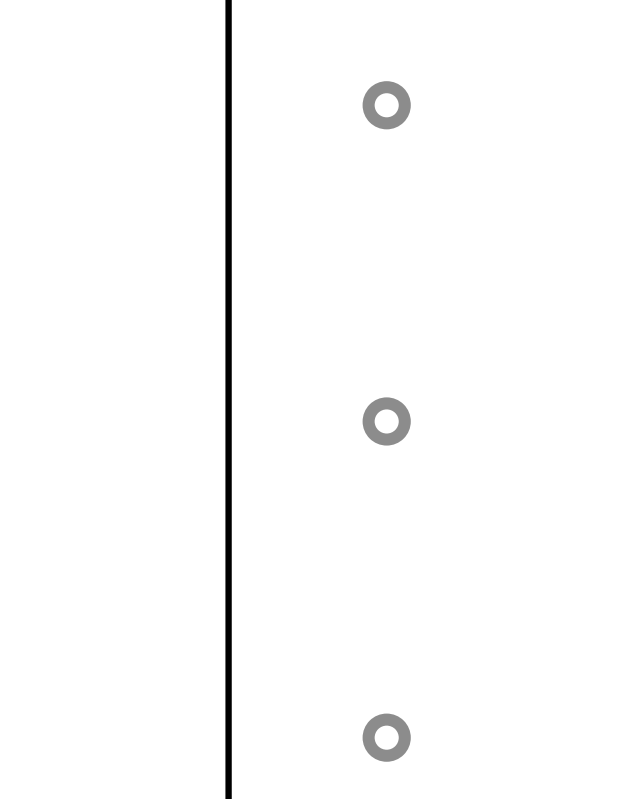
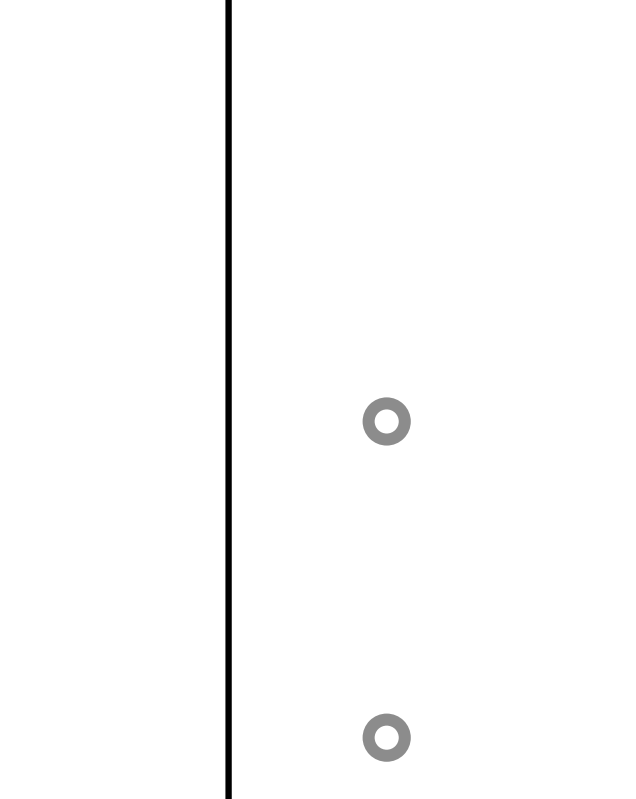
via: (386, 105) -> none

